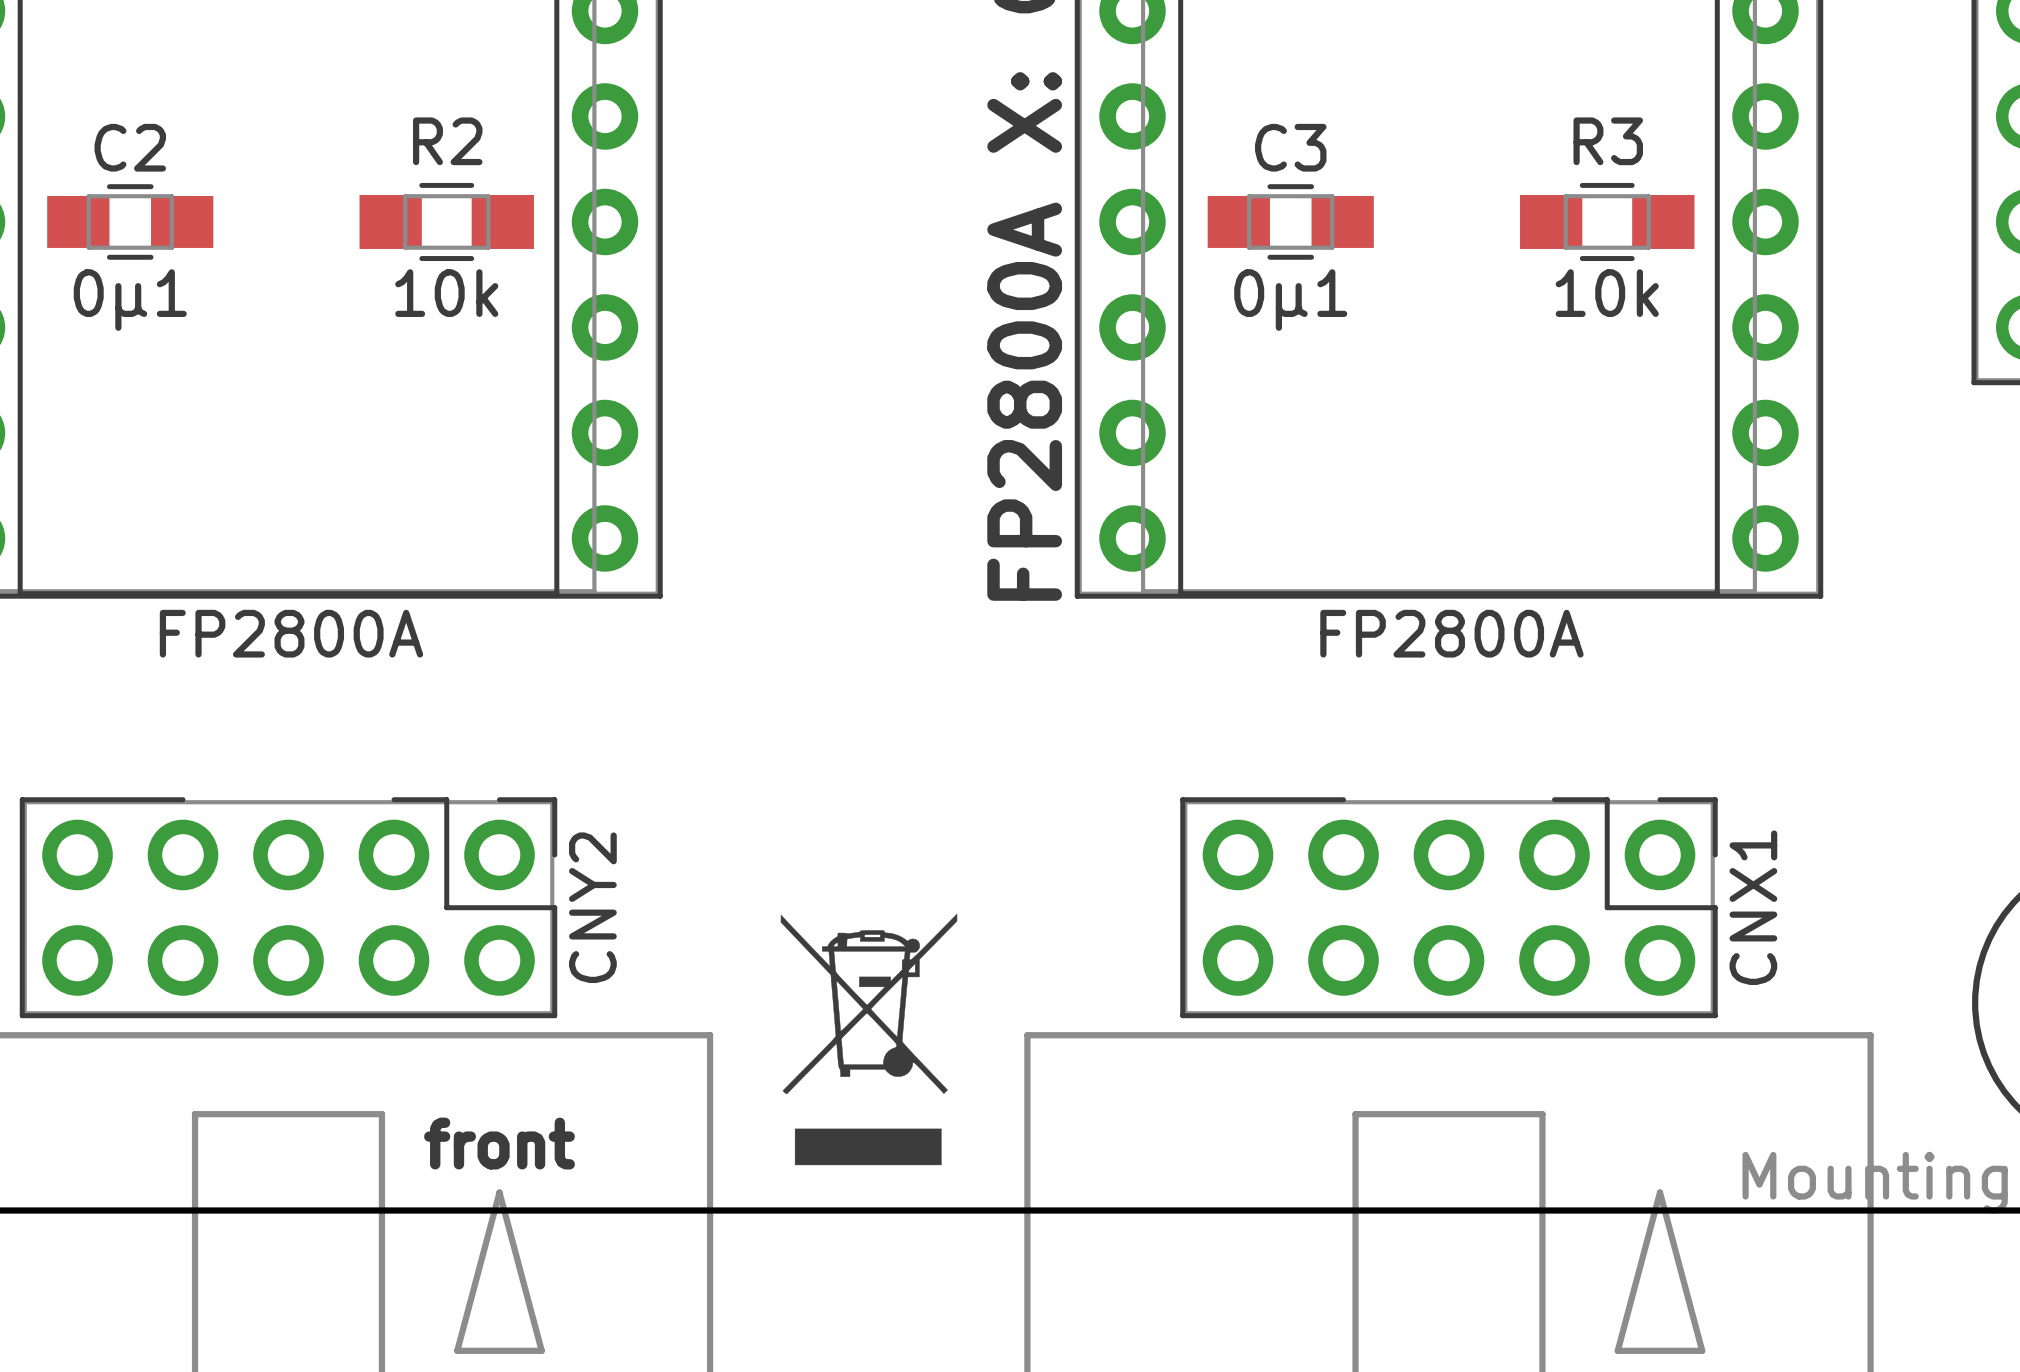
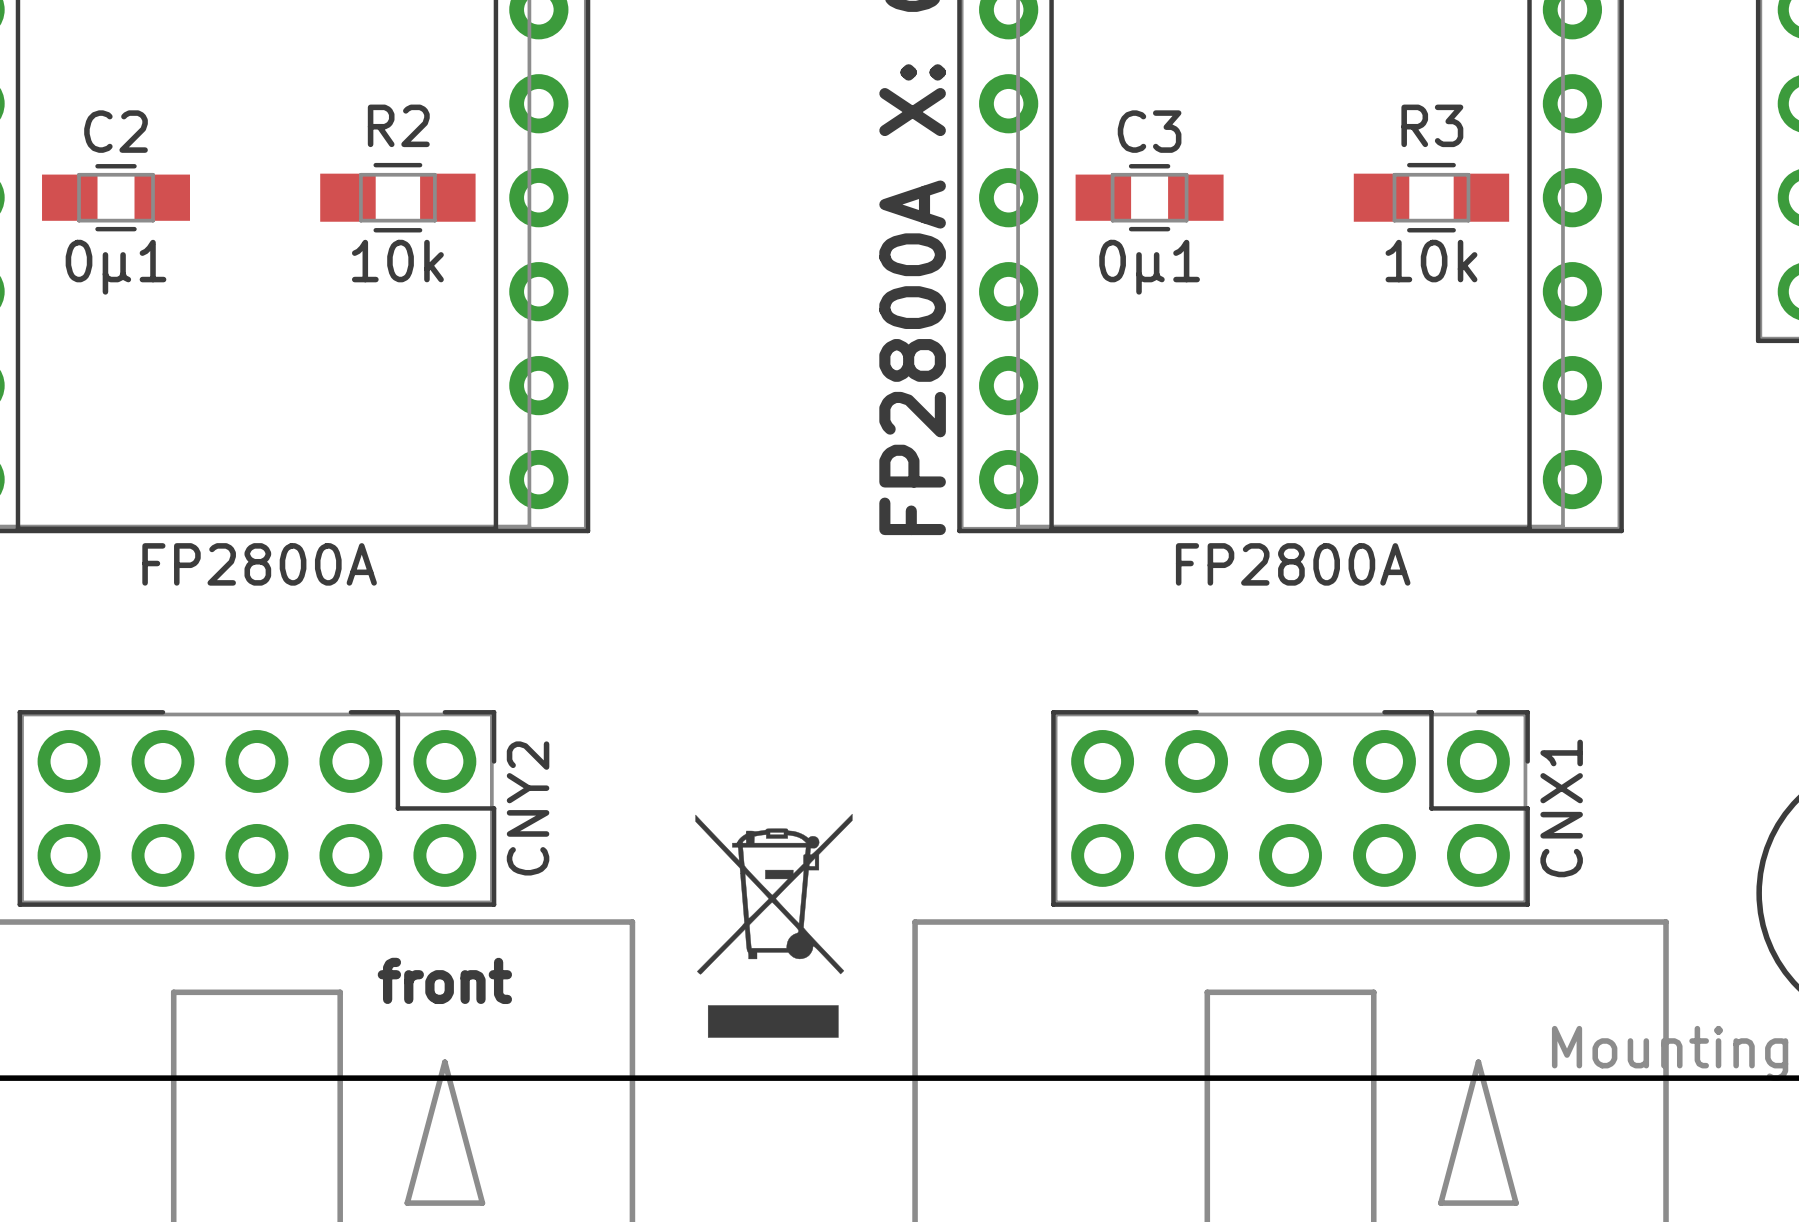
text position: front (499, 1143) -> front (444, 980)

